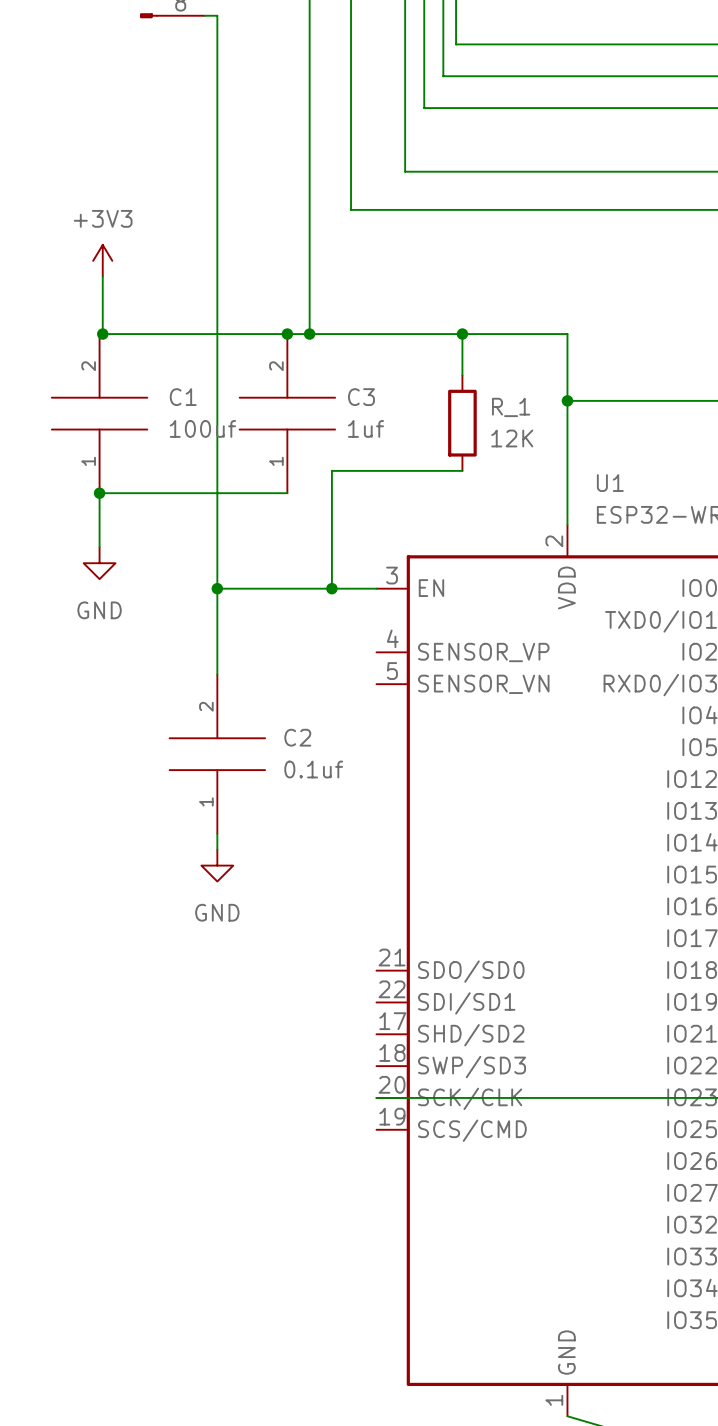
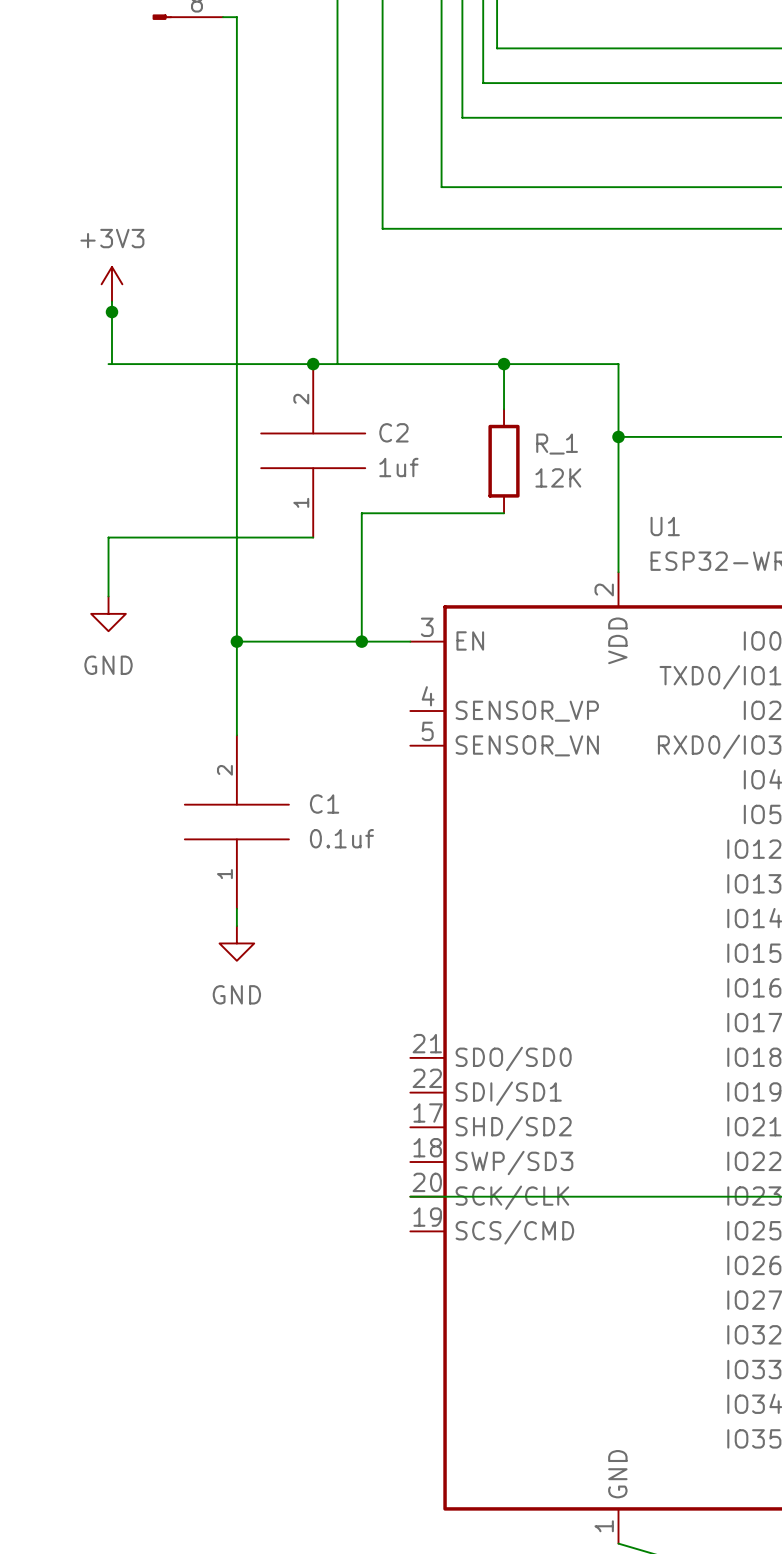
junction position: (102, 334) -> (111, 312)
junction: (309, 334) -> none
C3 name: C3 (361, 397) -> C2 (393, 432)
C1: 100uf (99, 413) -> none
junction: (99, 493) -> none
C2 name: C2 (297, 737) -> C1 (324, 804)

